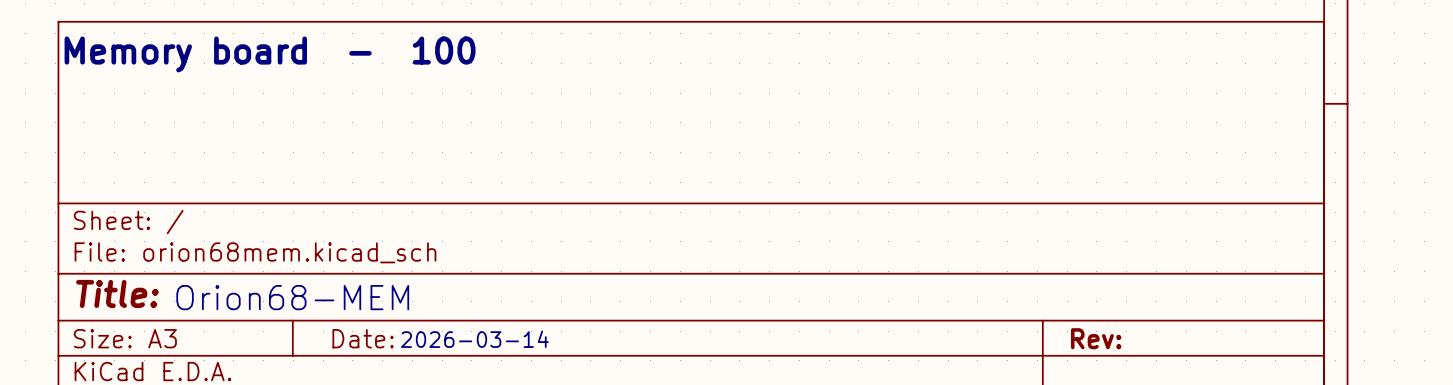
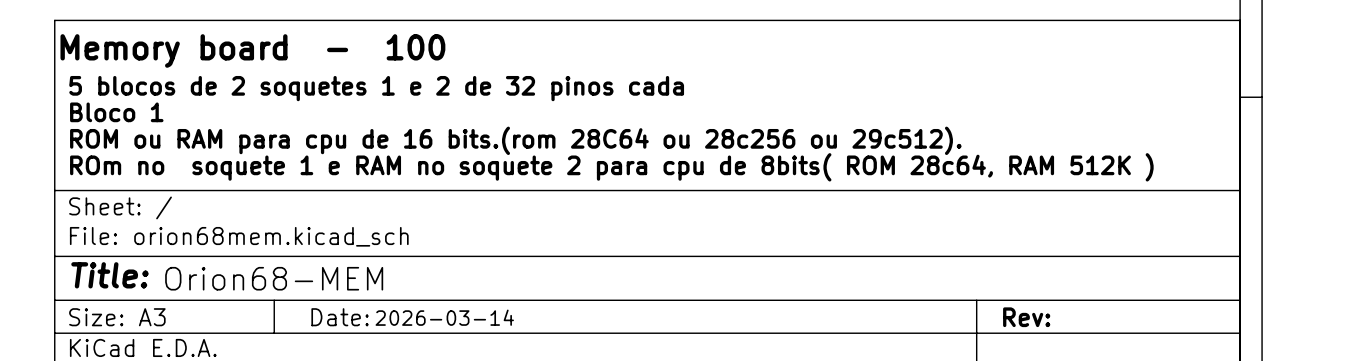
text: none -> 5 blocos de 2 soquetes 1 e 2 de 32 pinos cada (376, 88)
text: none -> Bloco 1 (116, 112)
text: none -> ROM ou RAM para cpu de 16 bits.(rom 28C64 ou 28c256 ou 29c512). (515, 140)
text: none -> ROm no soquete 1 e RAM no soquete 2 para cpu de 8bits( ROM 28c64, RAM 512K ) (611, 167)

